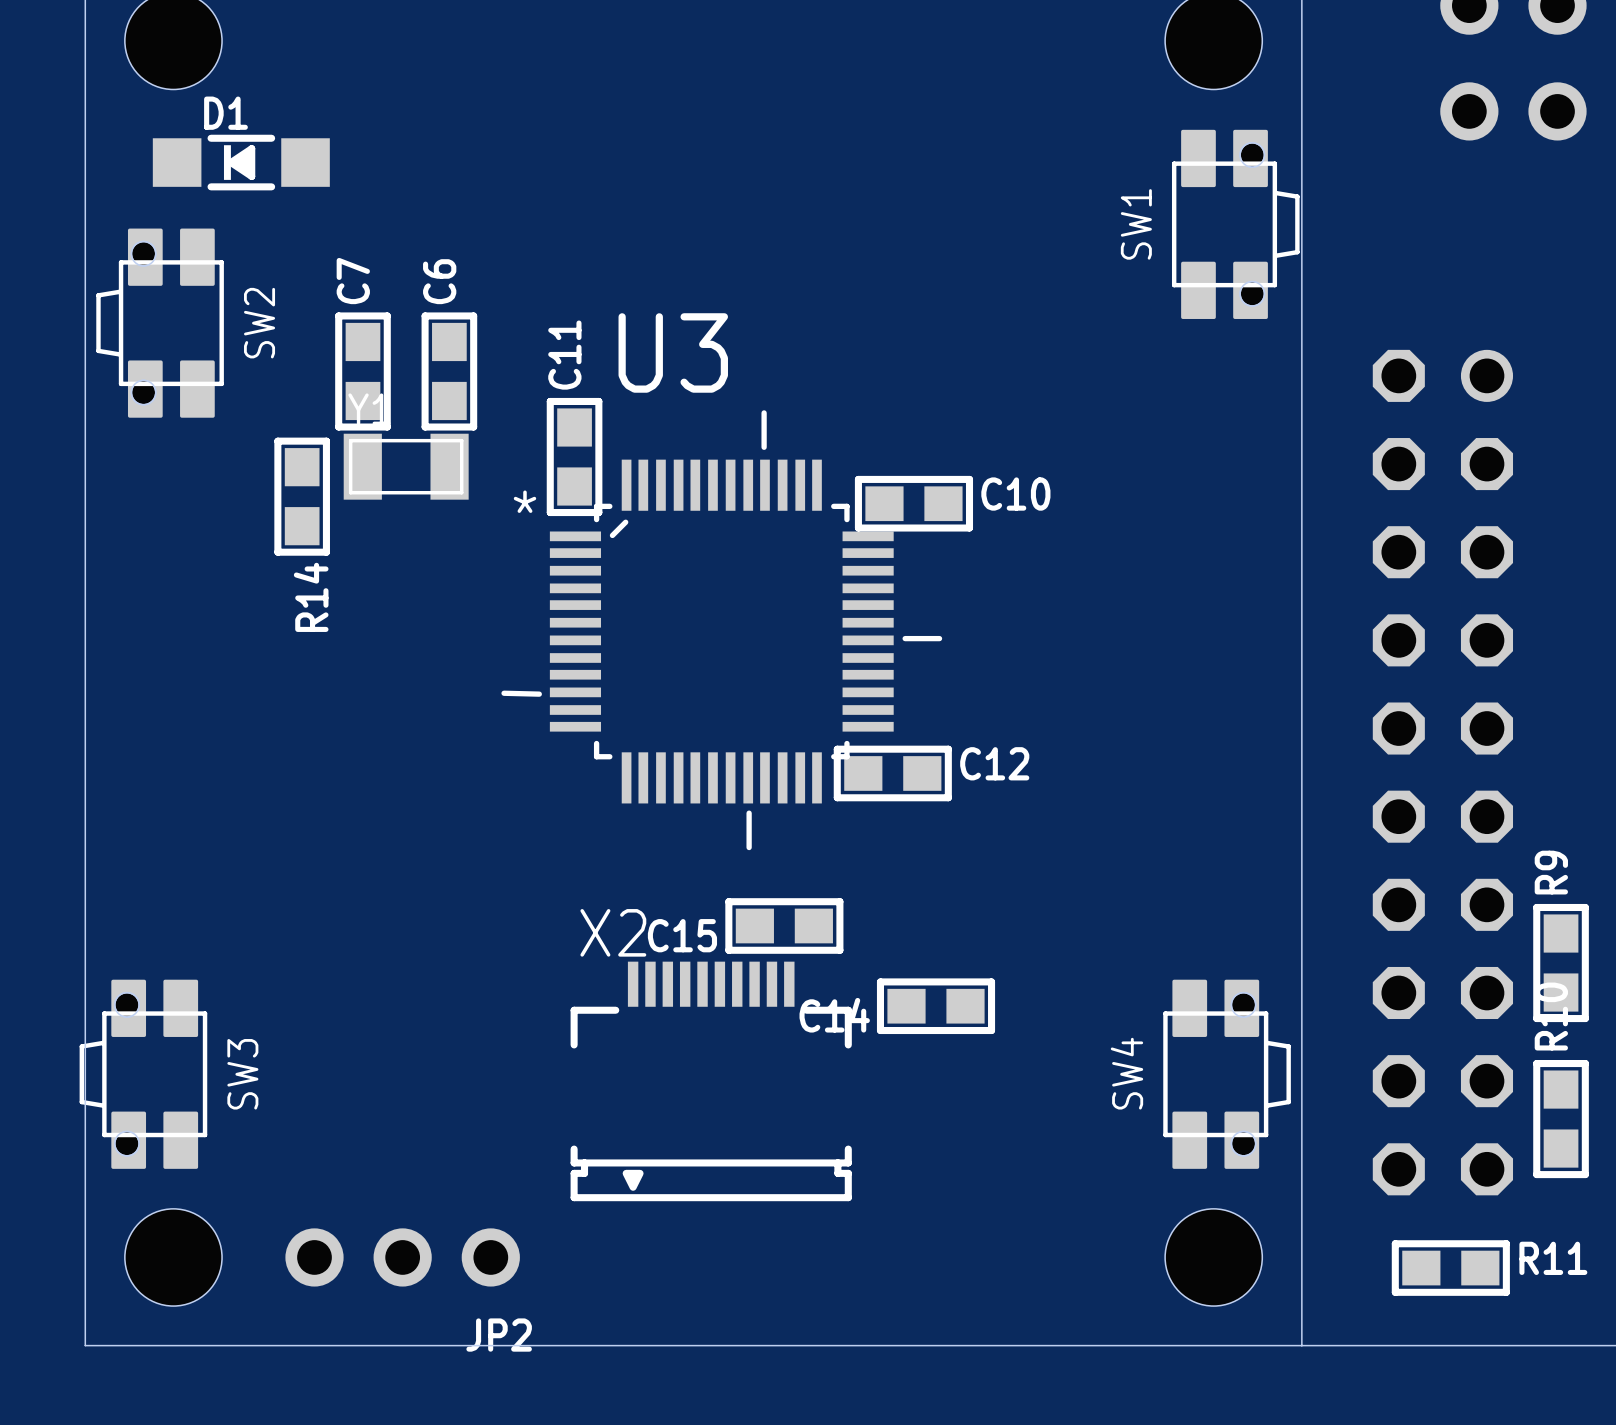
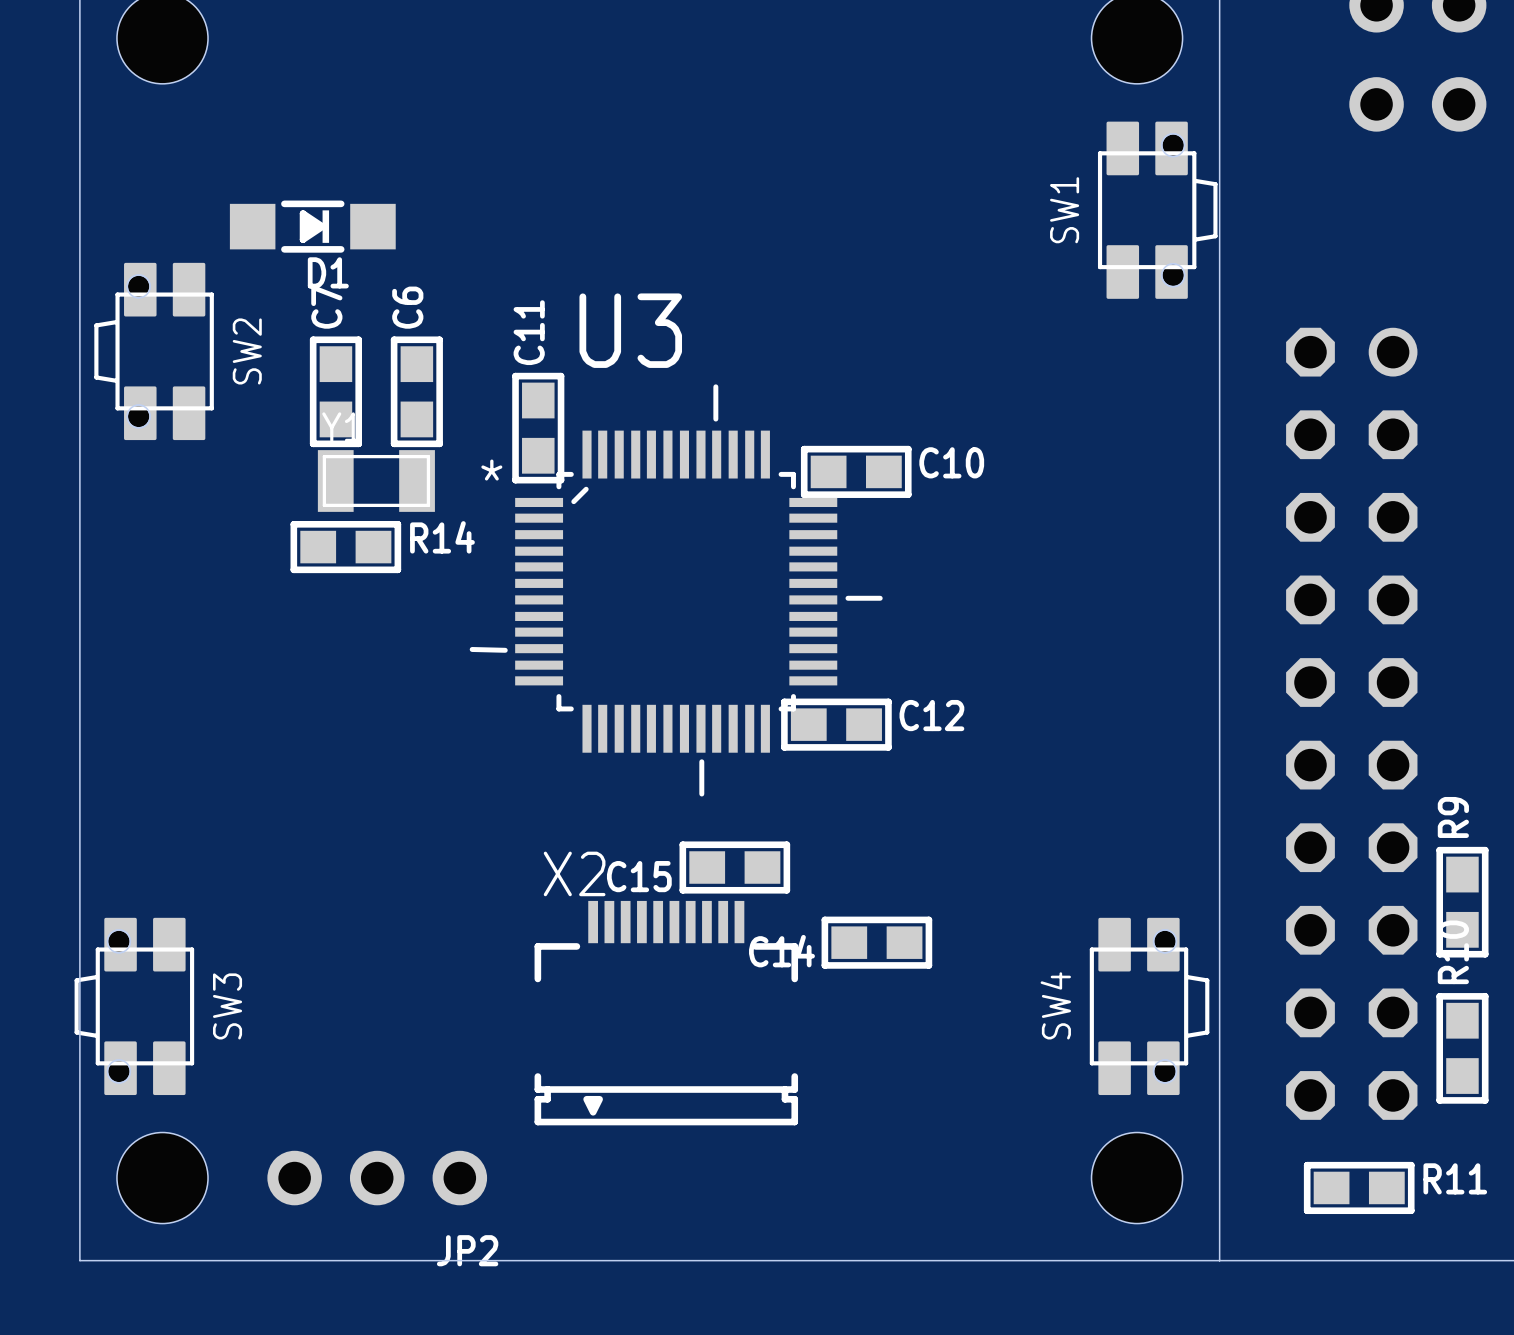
D1 rotation: 0° (241, 162) -> 180° (312, 226)
D1 position: (241, 162) -> (312, 226)
SW2 position: (160, 323) -> (154, 351)
C7 position: (362, 371) -> (335, 391)
C6 position: (449, 371) -> (416, 391)
part position: (406, 466) -> (376, 480)
R14 rotation: 0° (302, 496) -> 90° clockwise (345, 547)
R14 position: (302, 496) -> (345, 547)
R14 name position: R14 (311, 597) -> R14 (442, 537)

